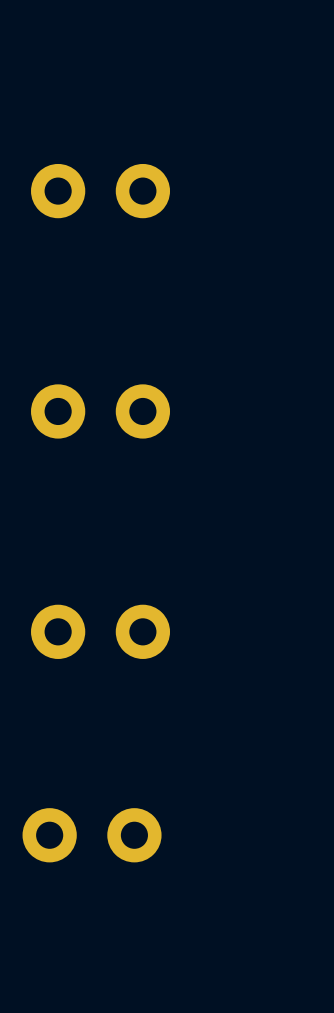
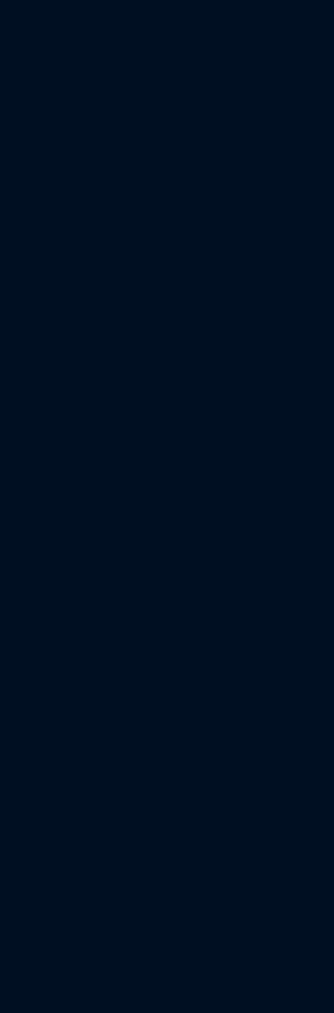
part: (100, 191) -> none
part: (100, 411) -> none
part: (100, 631) -> none
part: (92, 835) -> none

